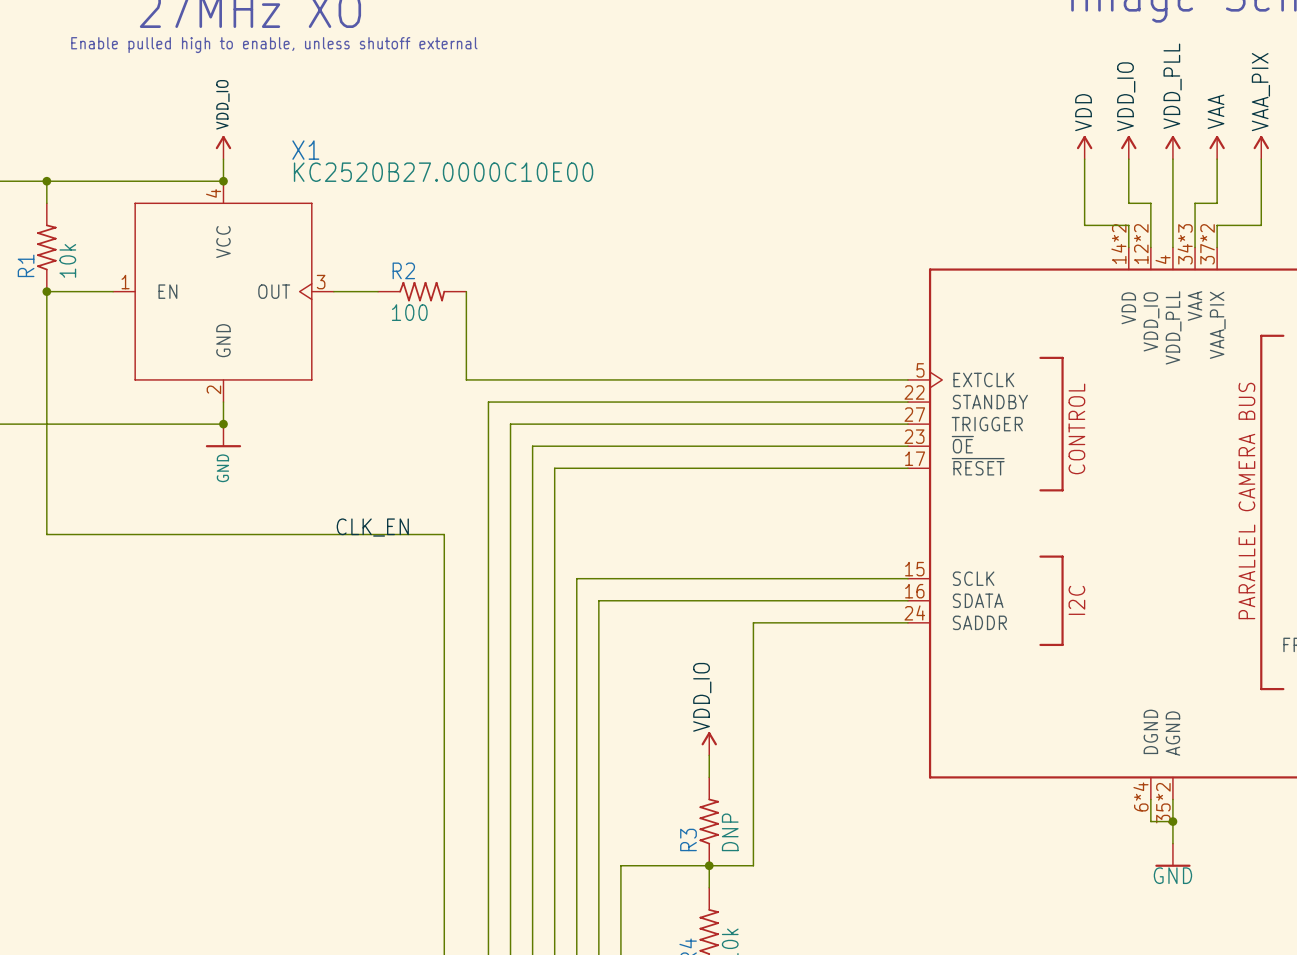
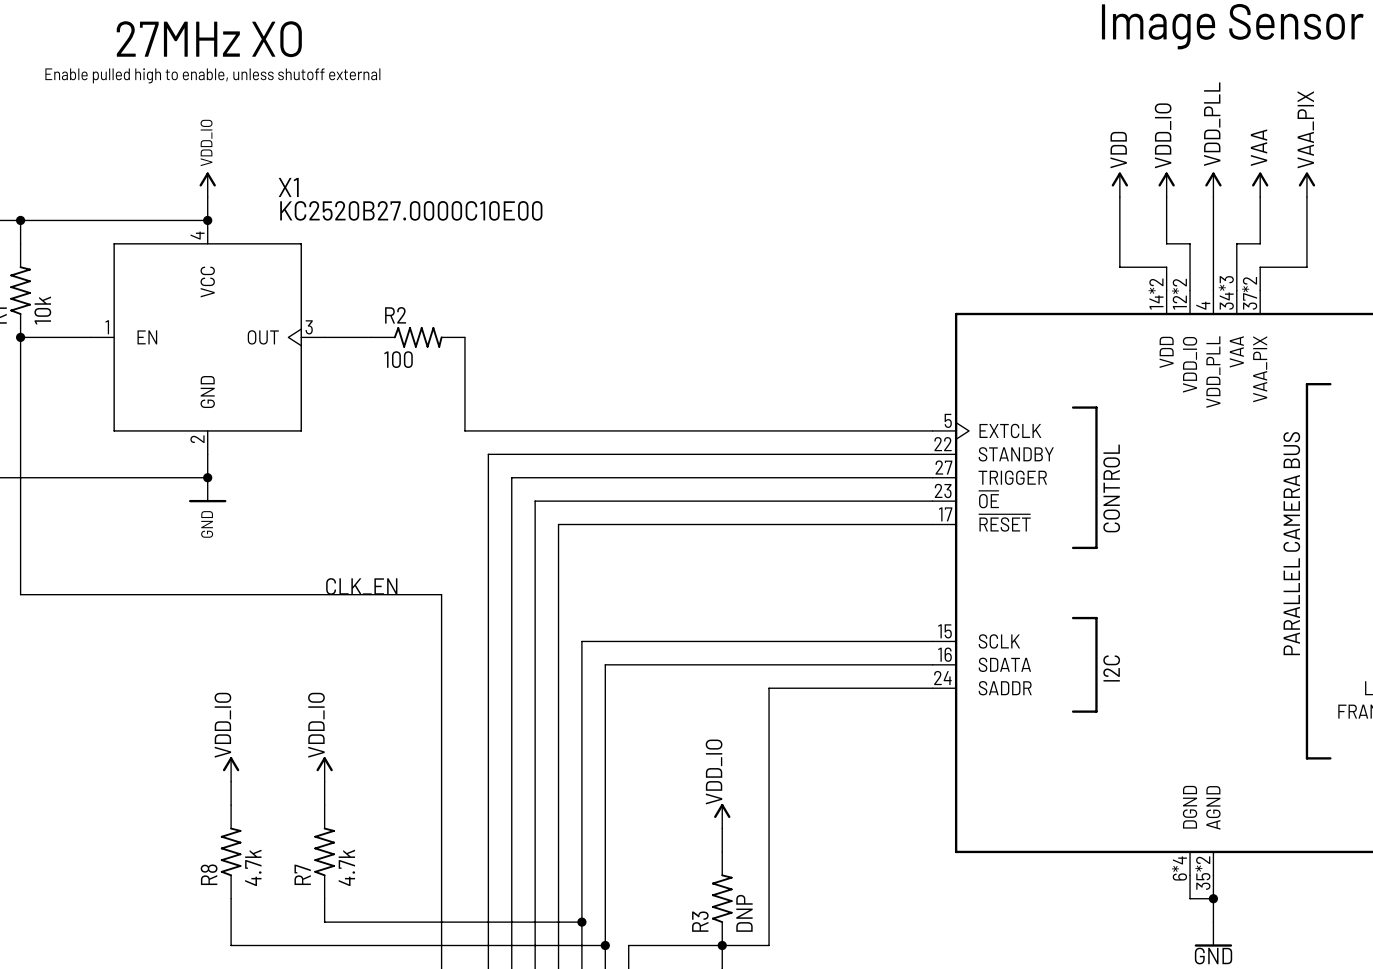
label: none -> VDD_IO (222, 725)
label: none -> VDD_IO (316, 725)
power symbol: none -> (231, 769)
power symbol: none -> (324, 769)
wire: none -> (231, 781) (231, 805)
wire: none -> (324, 781) (324, 805)
R8: none -> 4.7k (231, 851)
R7: none -> 4.7k (324, 851)
wire: none -> (231, 898) (231, 945) (605, 945)
wire: none -> (324, 898) (324, 922) (581, 922)
junction: none -> (581, 922)
junction: none -> (605, 945)

